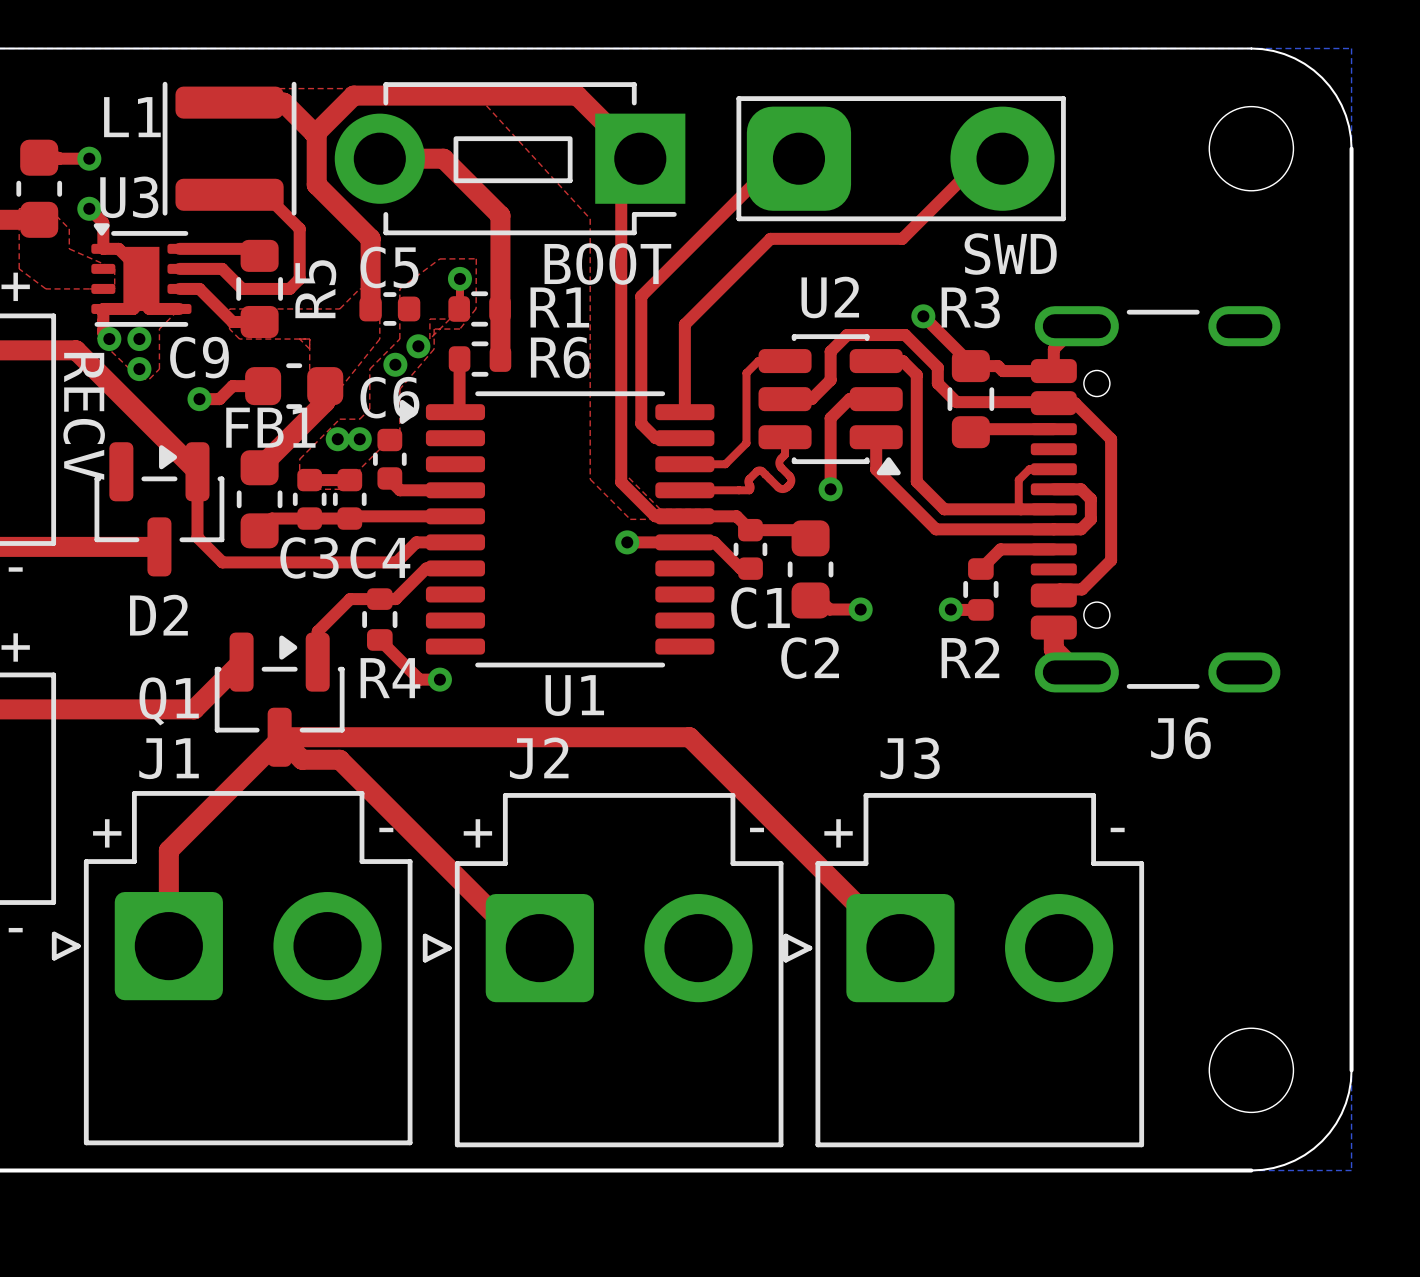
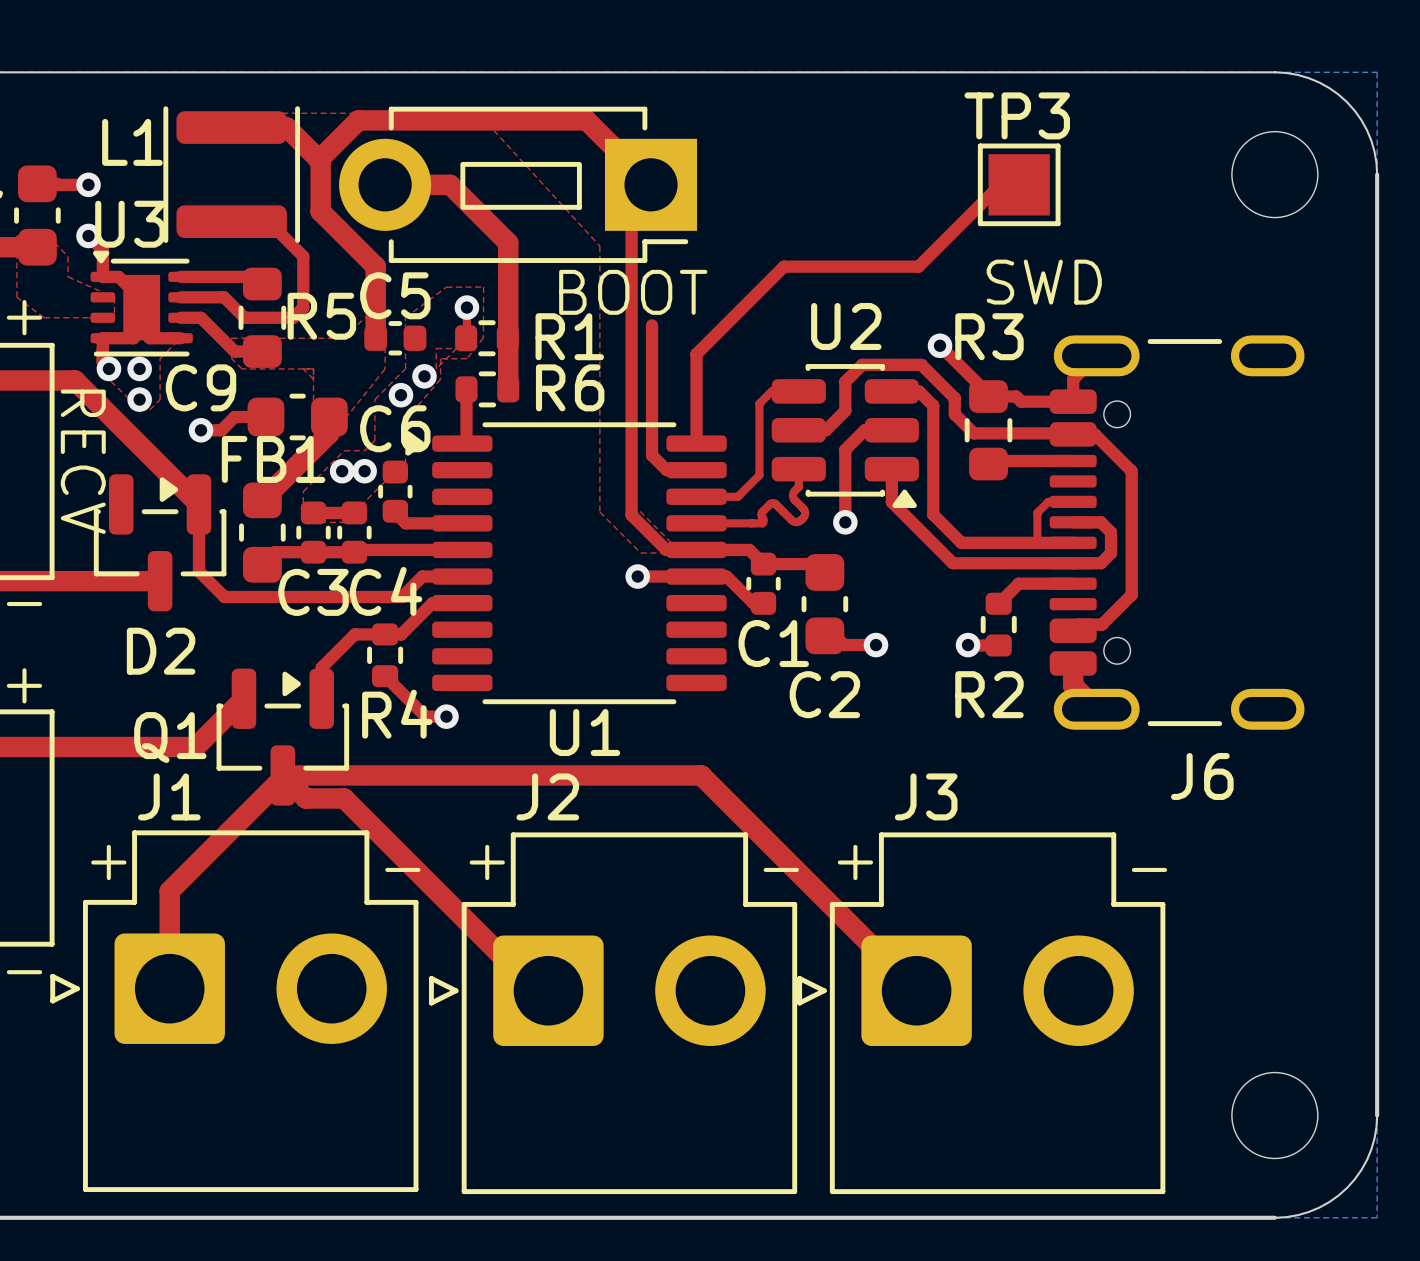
top track: (798, 148) (788, 148) (641, 296) -> none
part: (901, 158) -> none
TP3: none -> (1019, 184)
R5 name rotation: 0° (315, 289) -> 90° clockwise (321, 316)

